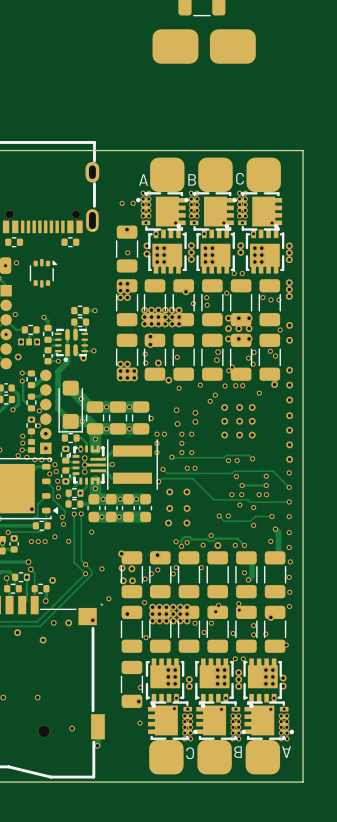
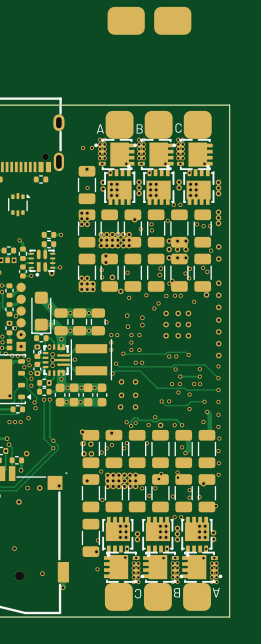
track: (67, 334) (67, 362) (58, 371) (58, 408) (70, 421) -> none
via: (91, 532) -> none
via: (68, 541) -> none
via: (101, 568) -> none
via: (108, 598) -> none

